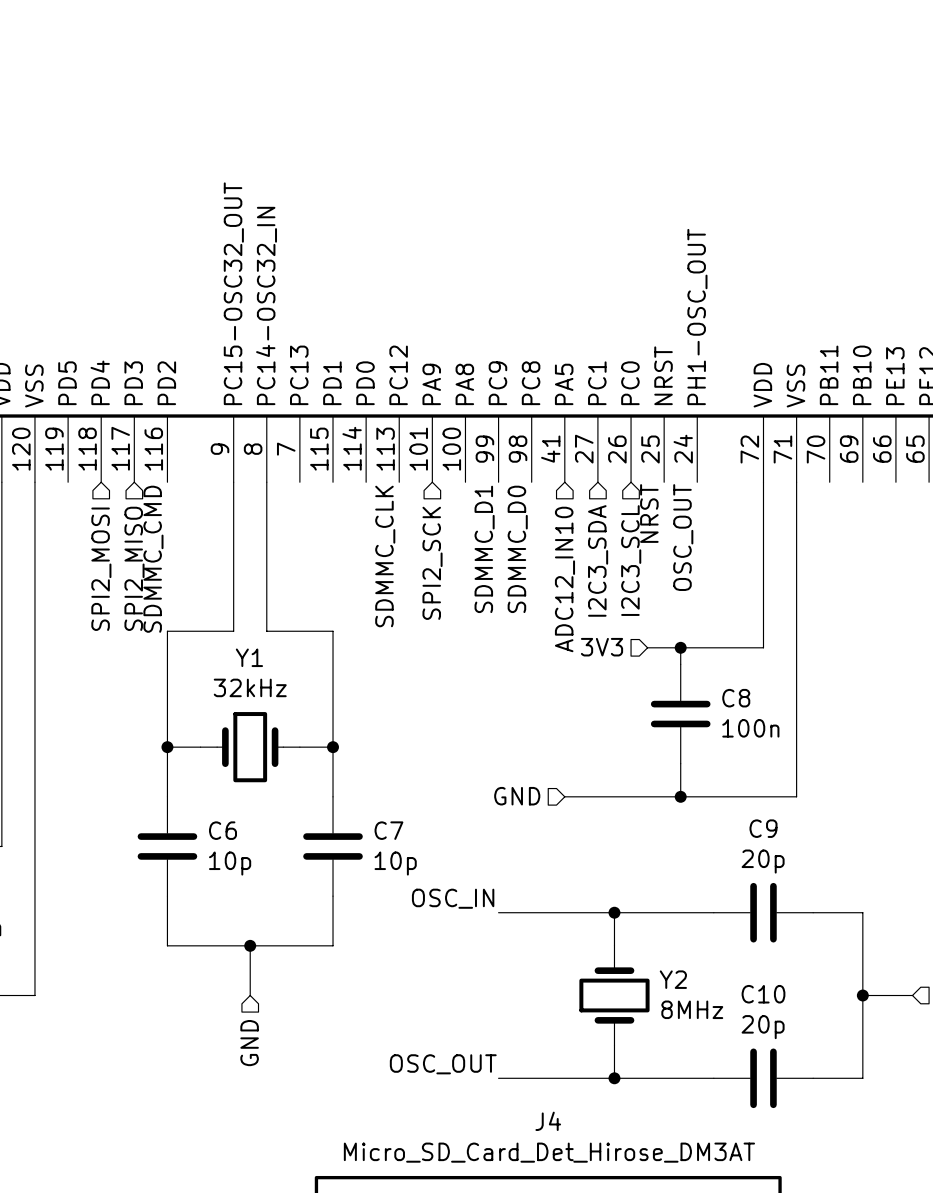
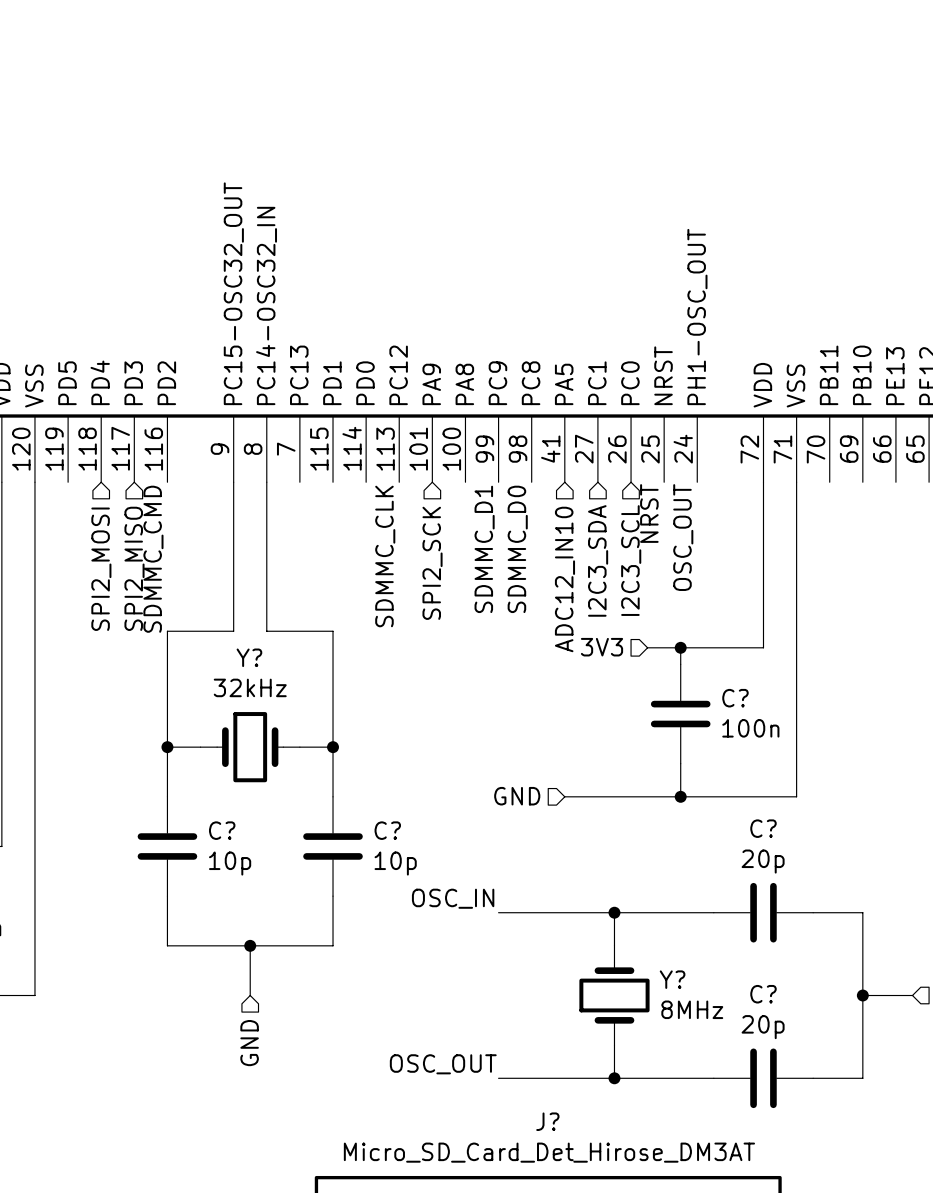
Y1 name: Y1 (249, 657) -> Y? (249, 657)
C8 name: C8 (736, 698) -> C? (735, 698)
C9 name: C9 (763, 828) -> C? (763, 828)
C6 name: C6 (222, 830) -> C? (222, 830)
C7 name: C7 (388, 830) -> C? (387, 830)
Y2 name: Y2 (673, 979) -> Y? (672, 979)
C10 name: C10 (763, 994) -> C? (763, 994)
J4 name: J4 (548, 1121) -> J? (547, 1121)

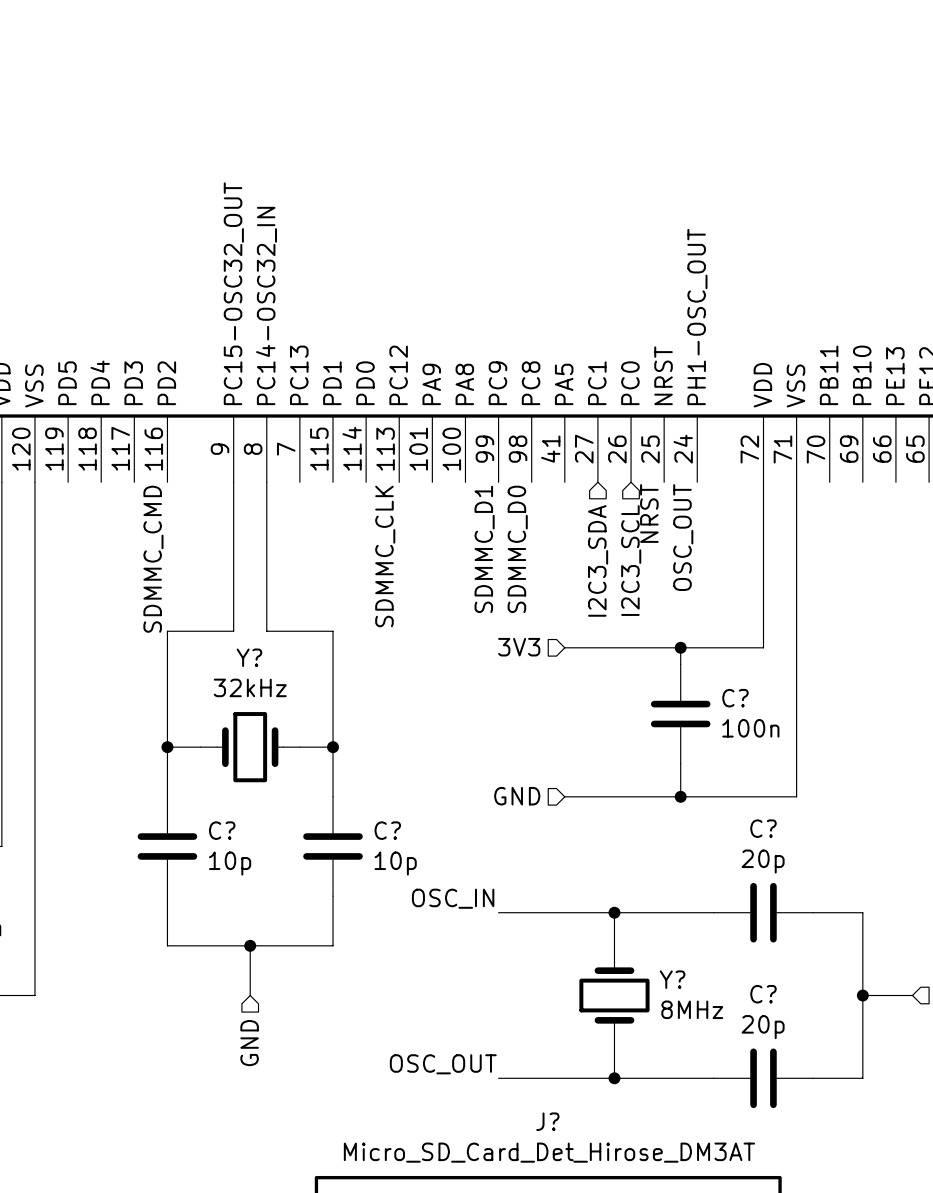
hierarchical label: SPI2_SCK (432, 563) -> none
hierarchical label: SPI2_MISO (134, 568) -> none
hierarchical label: SPI2_MOSI (101, 569) -> none
hierarchical label: ADC12_IN10 (564, 579) -> none
wire: none -> (564, 647) (647, 647)
hierarchical label position: 3V3 (602, 647) -> 3V3 (519, 647)

